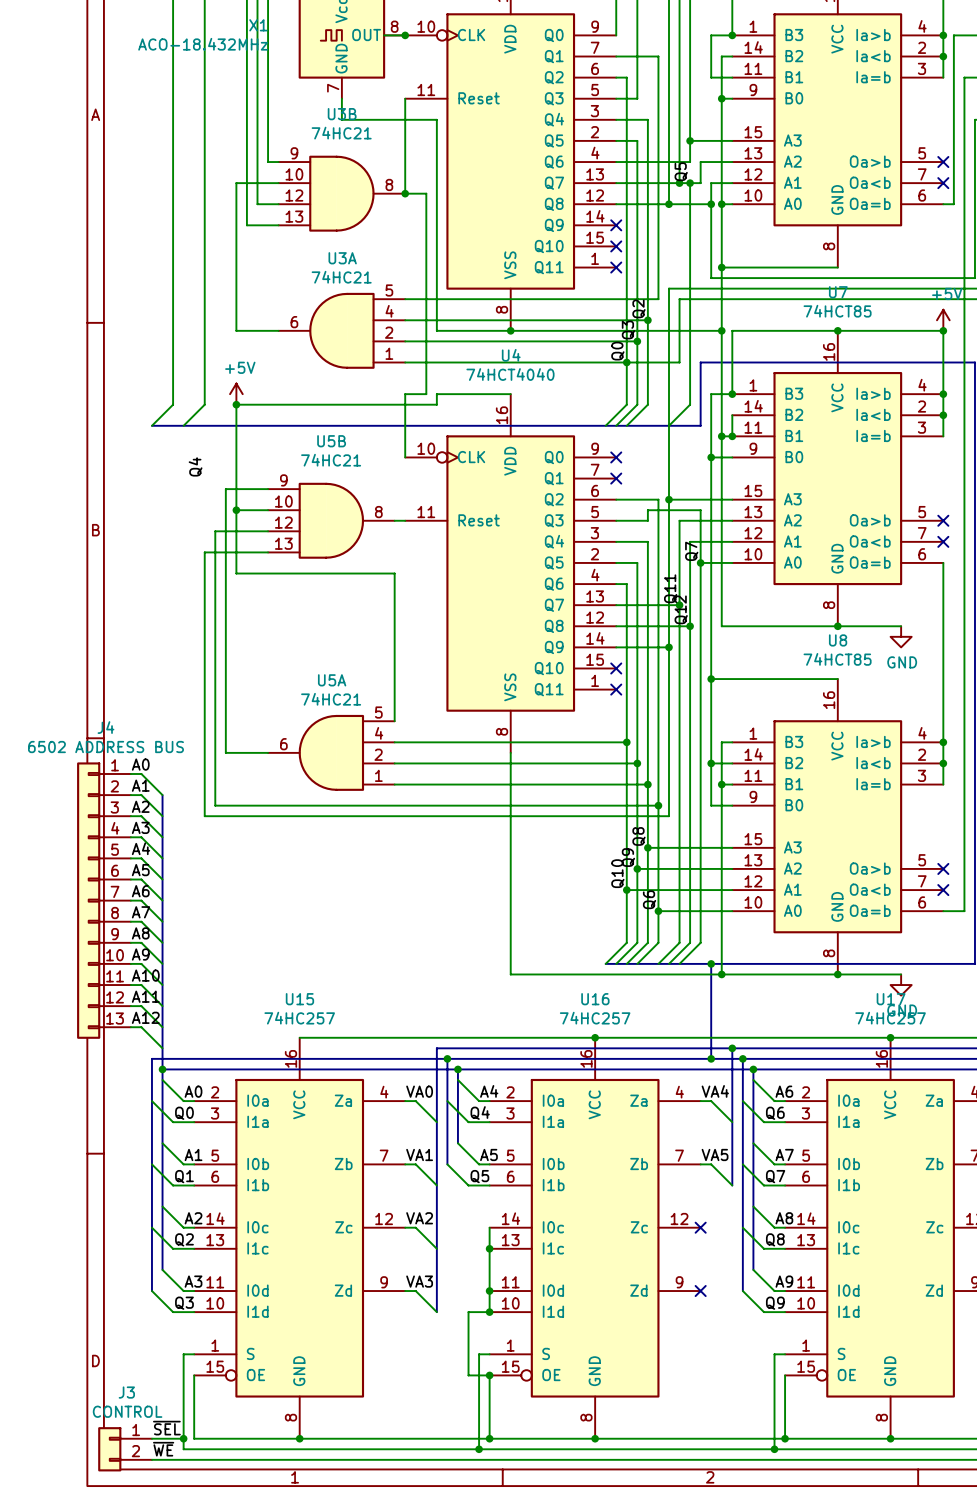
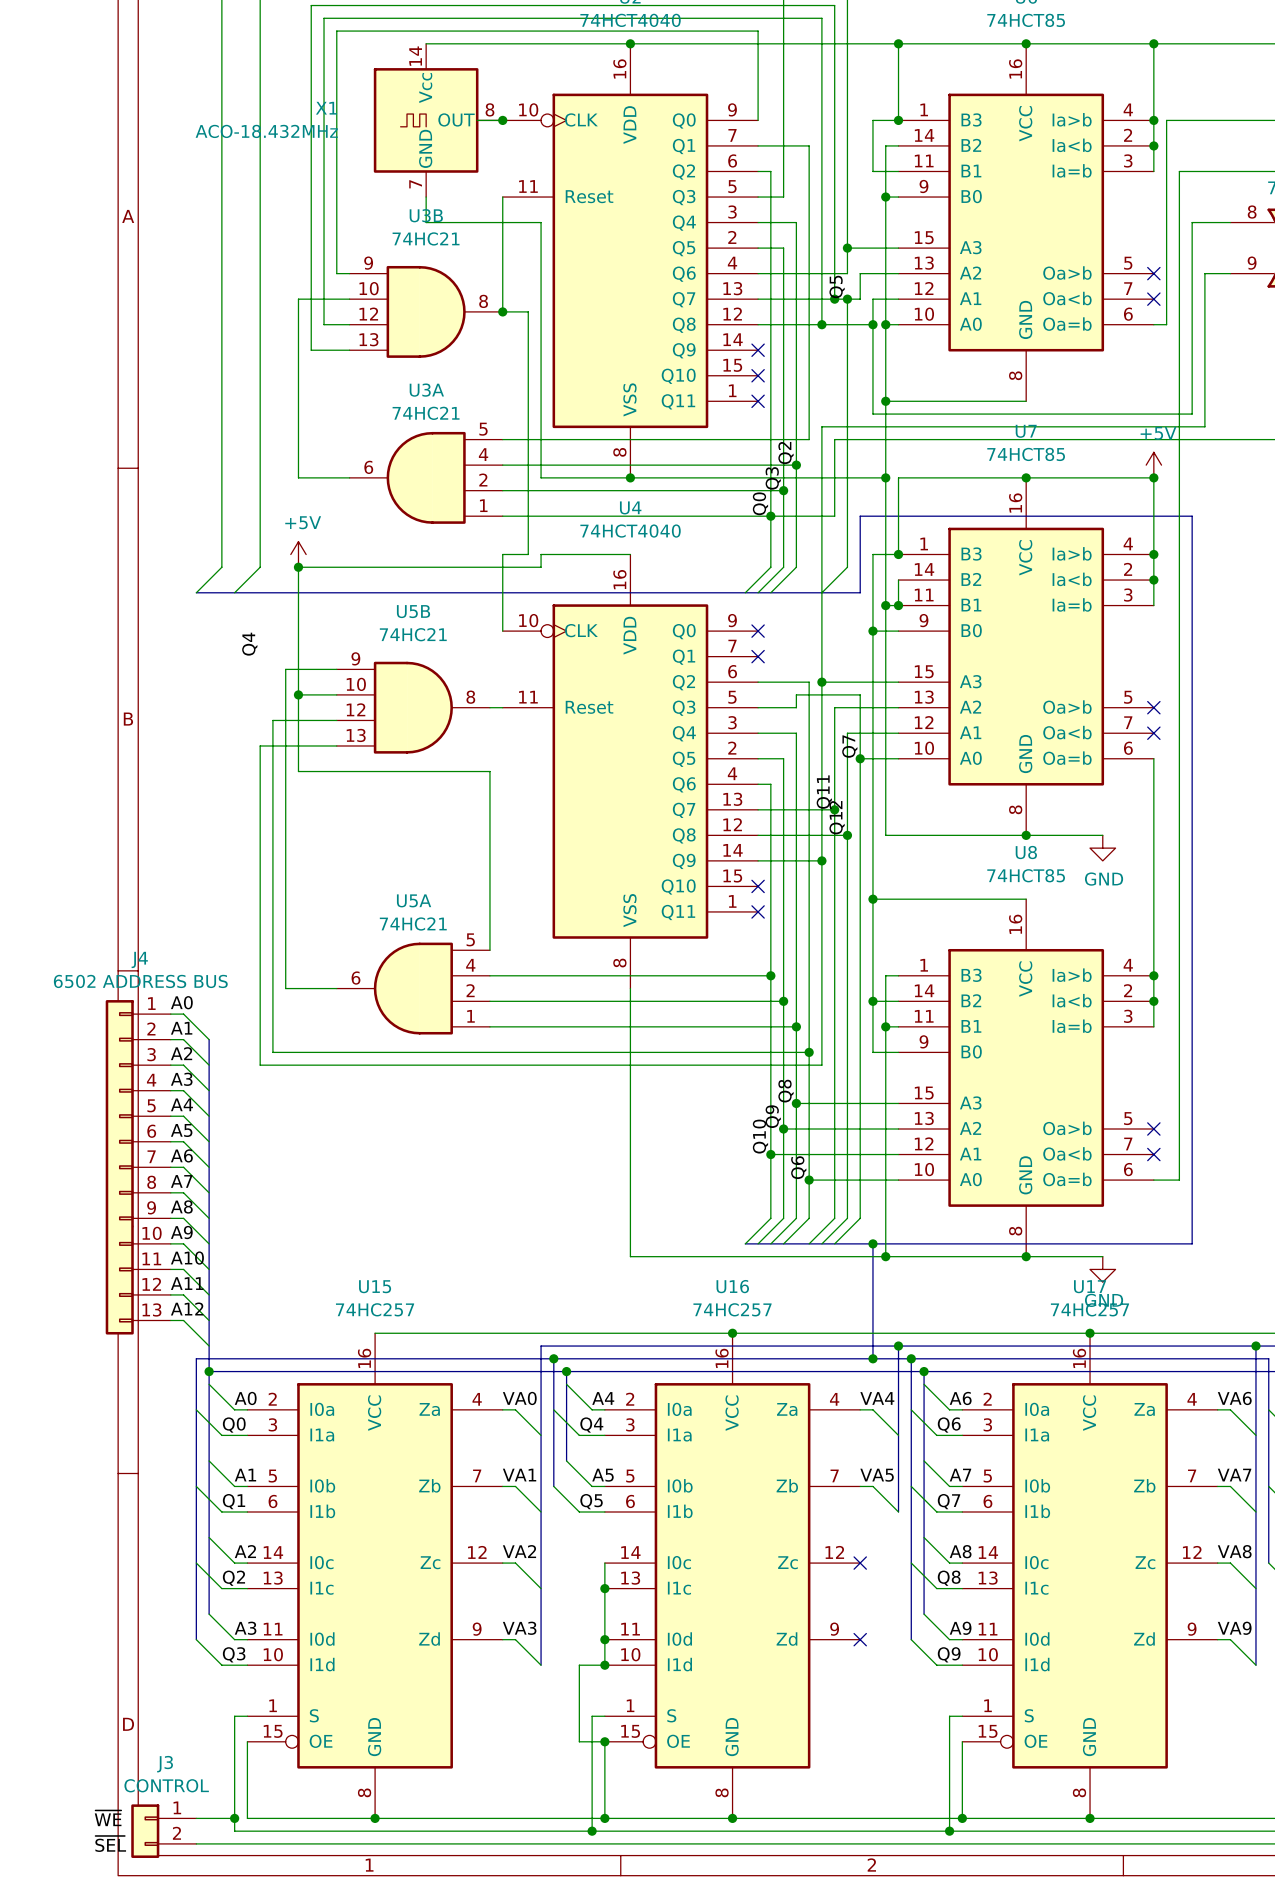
label position: ~{SEL} (166, 1428) -> ~{SEL} (110, 1843)
label position: ~{WE} (163, 1449) -> ~{WE} (108, 1818)

